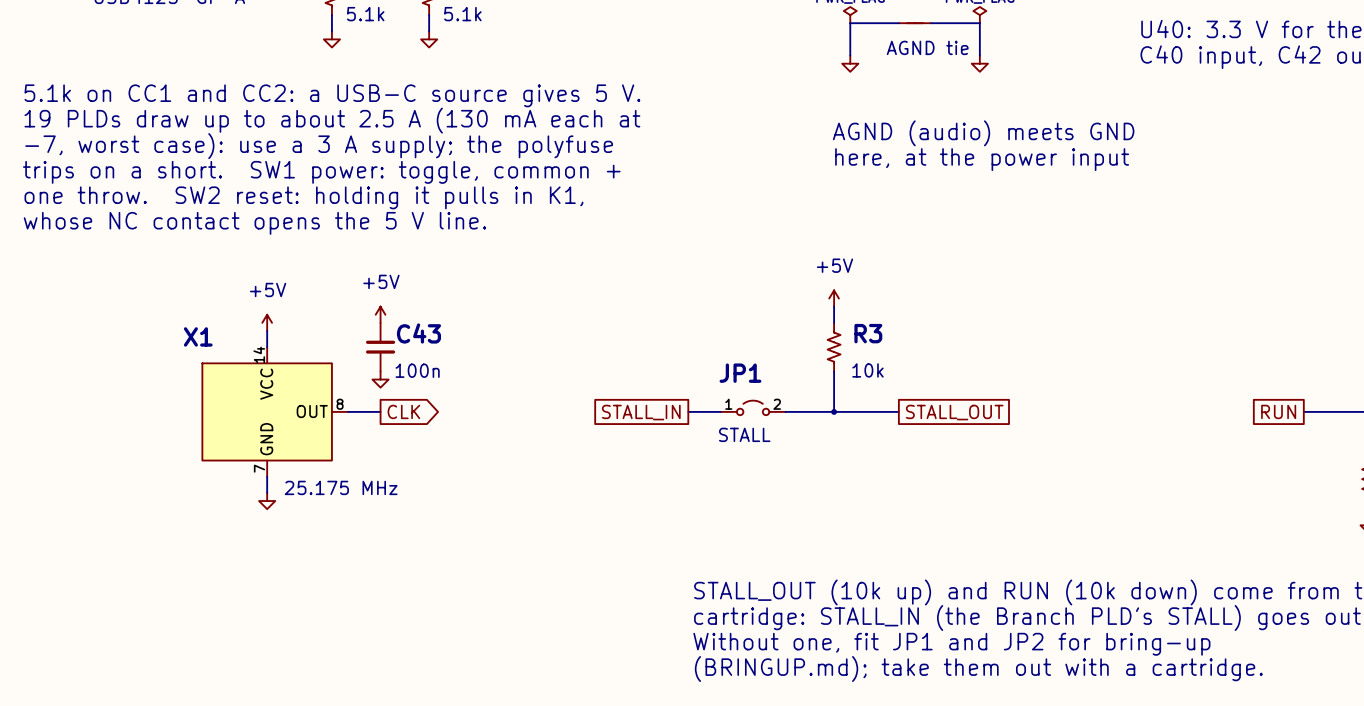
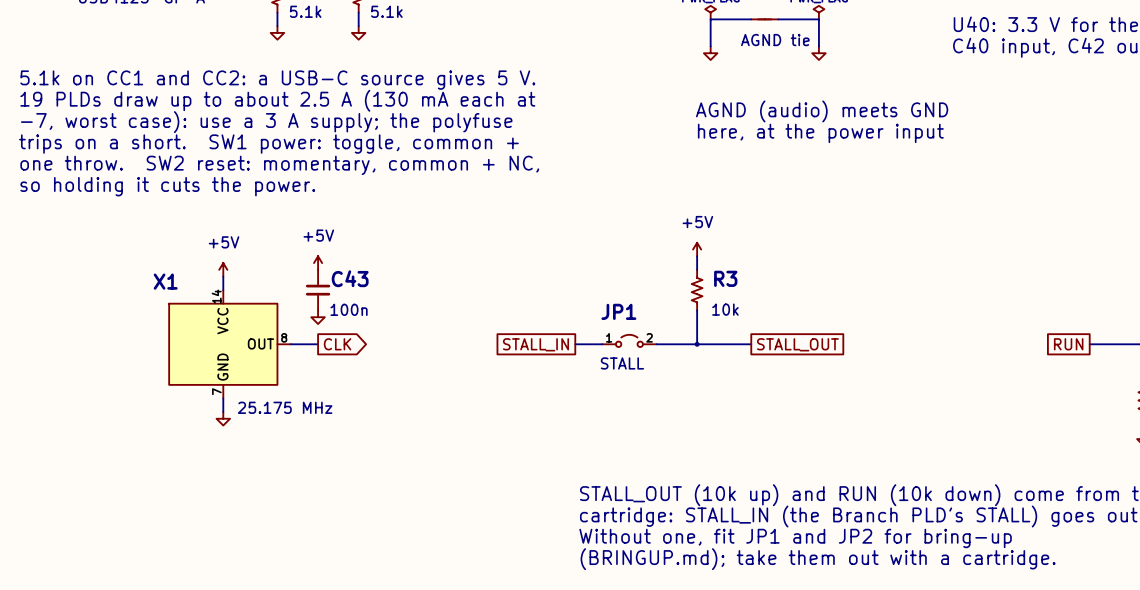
text: one throw. SW2 reset: holding it pulls in K1, (303, 197) -> one throw. SW2 reset: momentary, common + NC, (279, 165)
text: whose NC contact opens the 5 V line. (254, 223) -> so holding it cuts the power. (167, 186)

